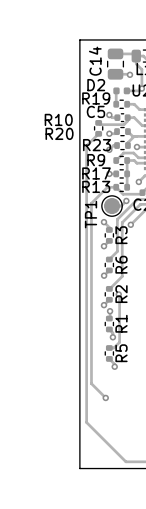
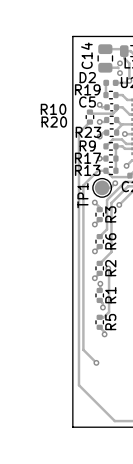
via: none -> (119, 63)
via: (129, 74) -> none
via: none -> (119, 73)

